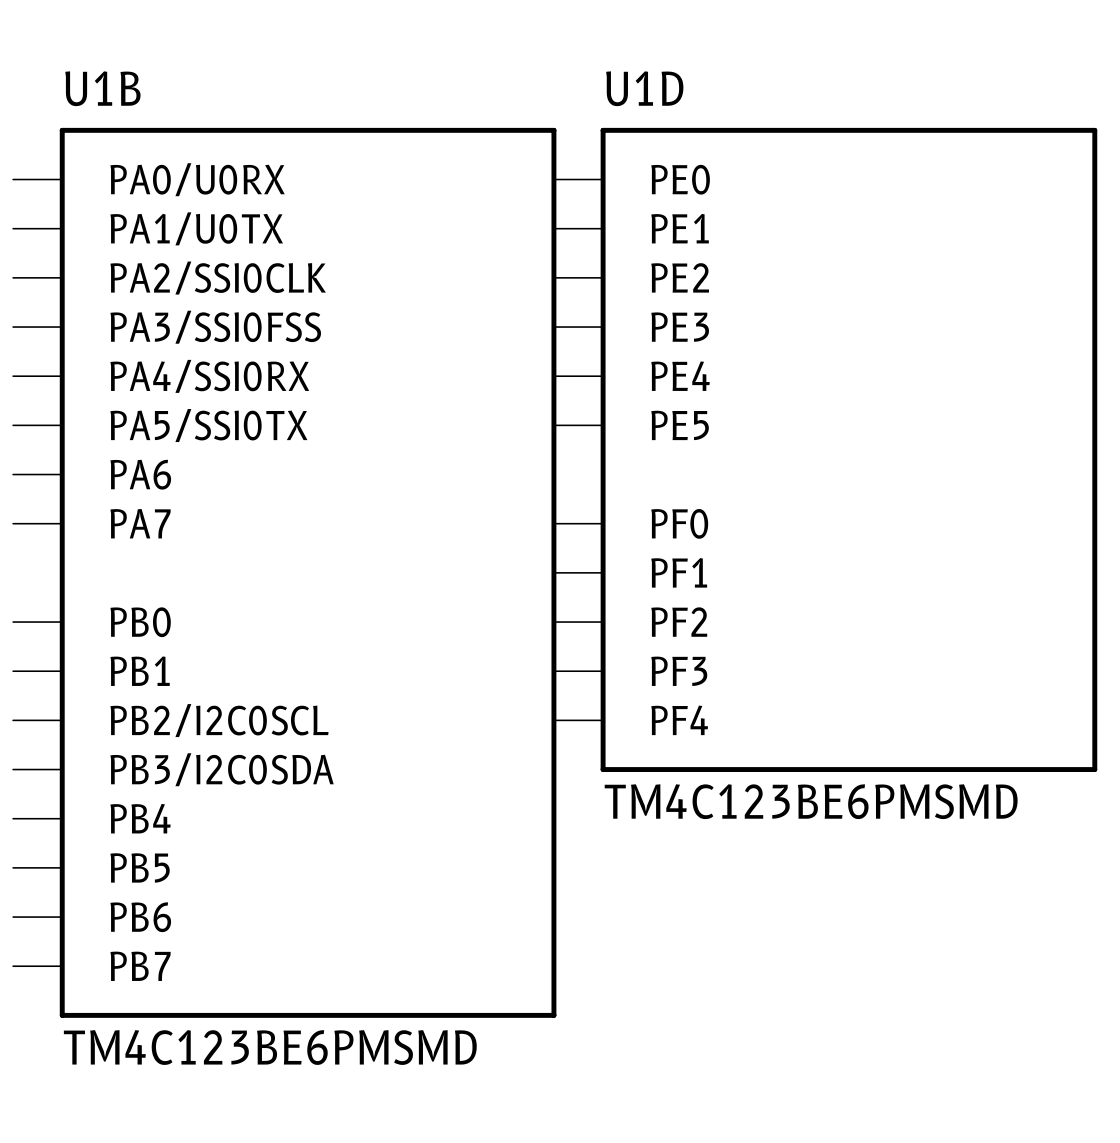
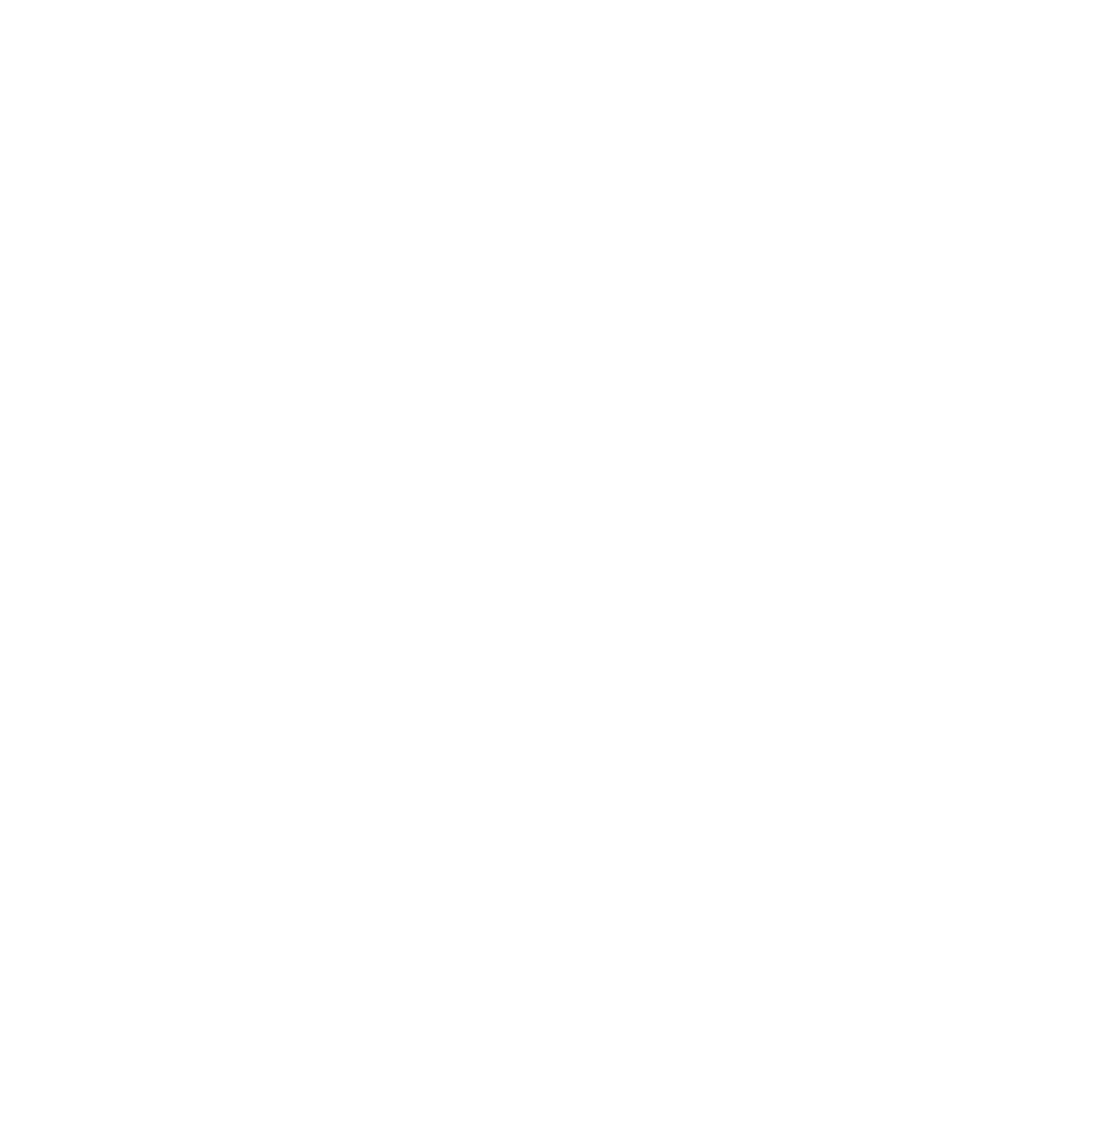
U1D: TM4C123BE6PMSMD (825, 449) -> none
U1B: TM4C123BE6PMSMD (284, 572) -> none

